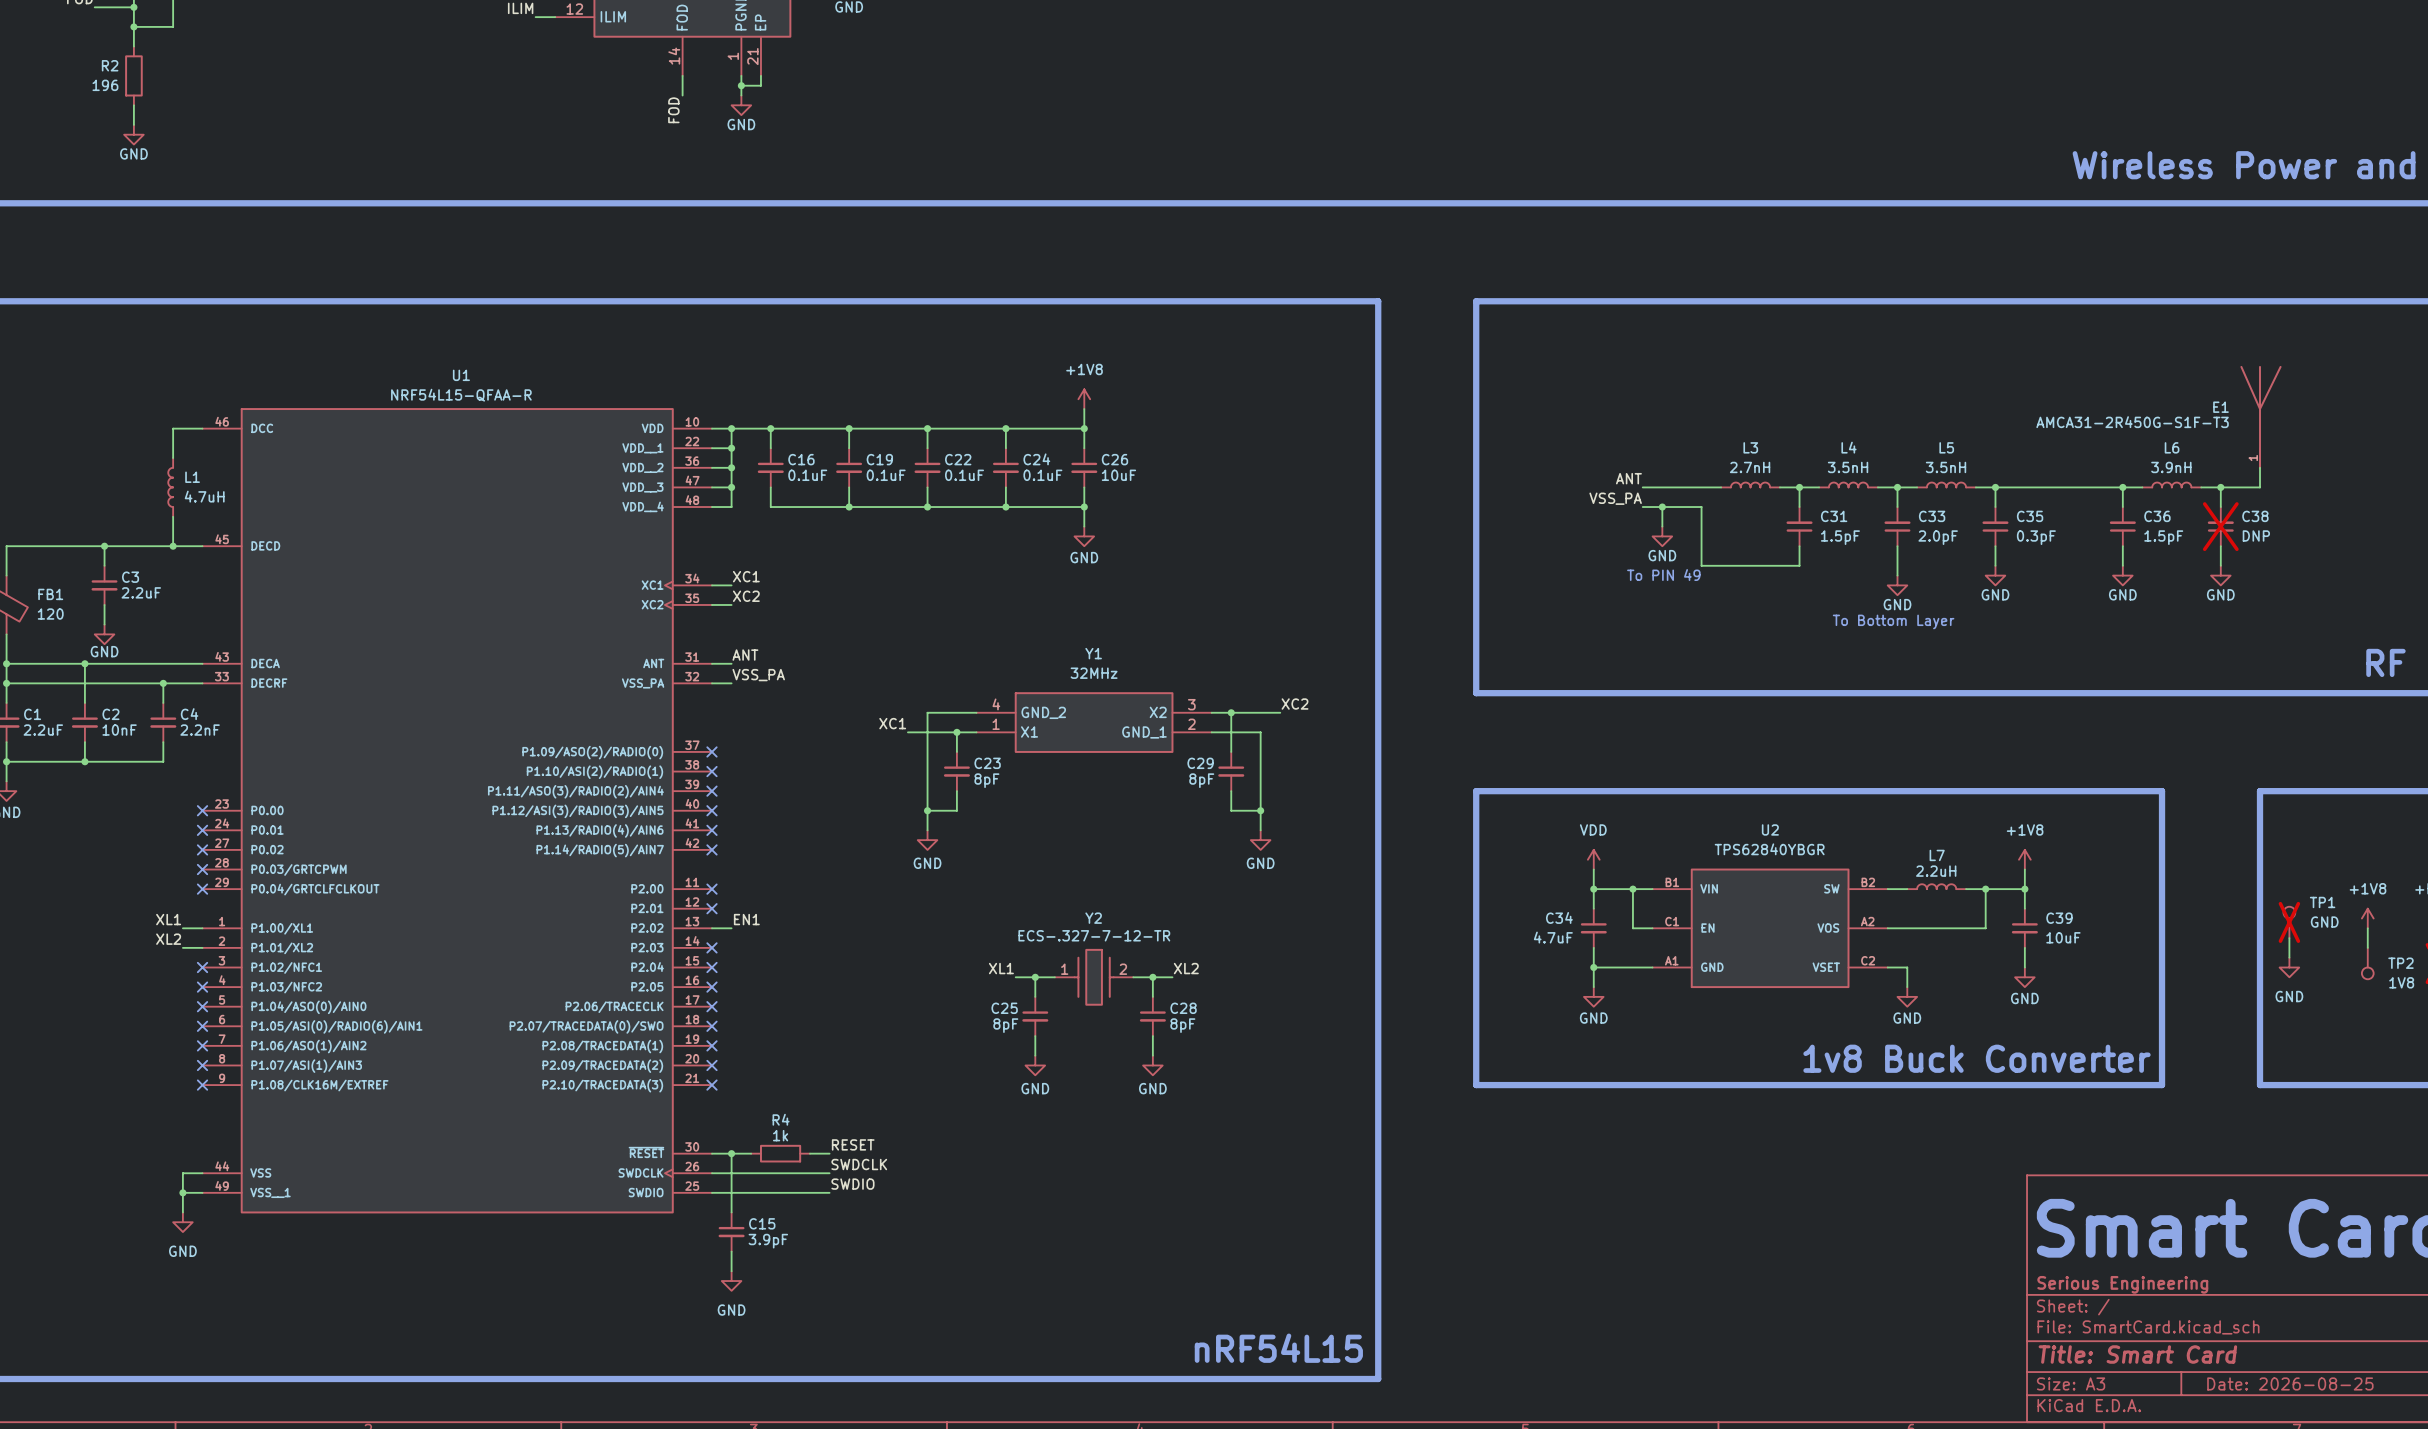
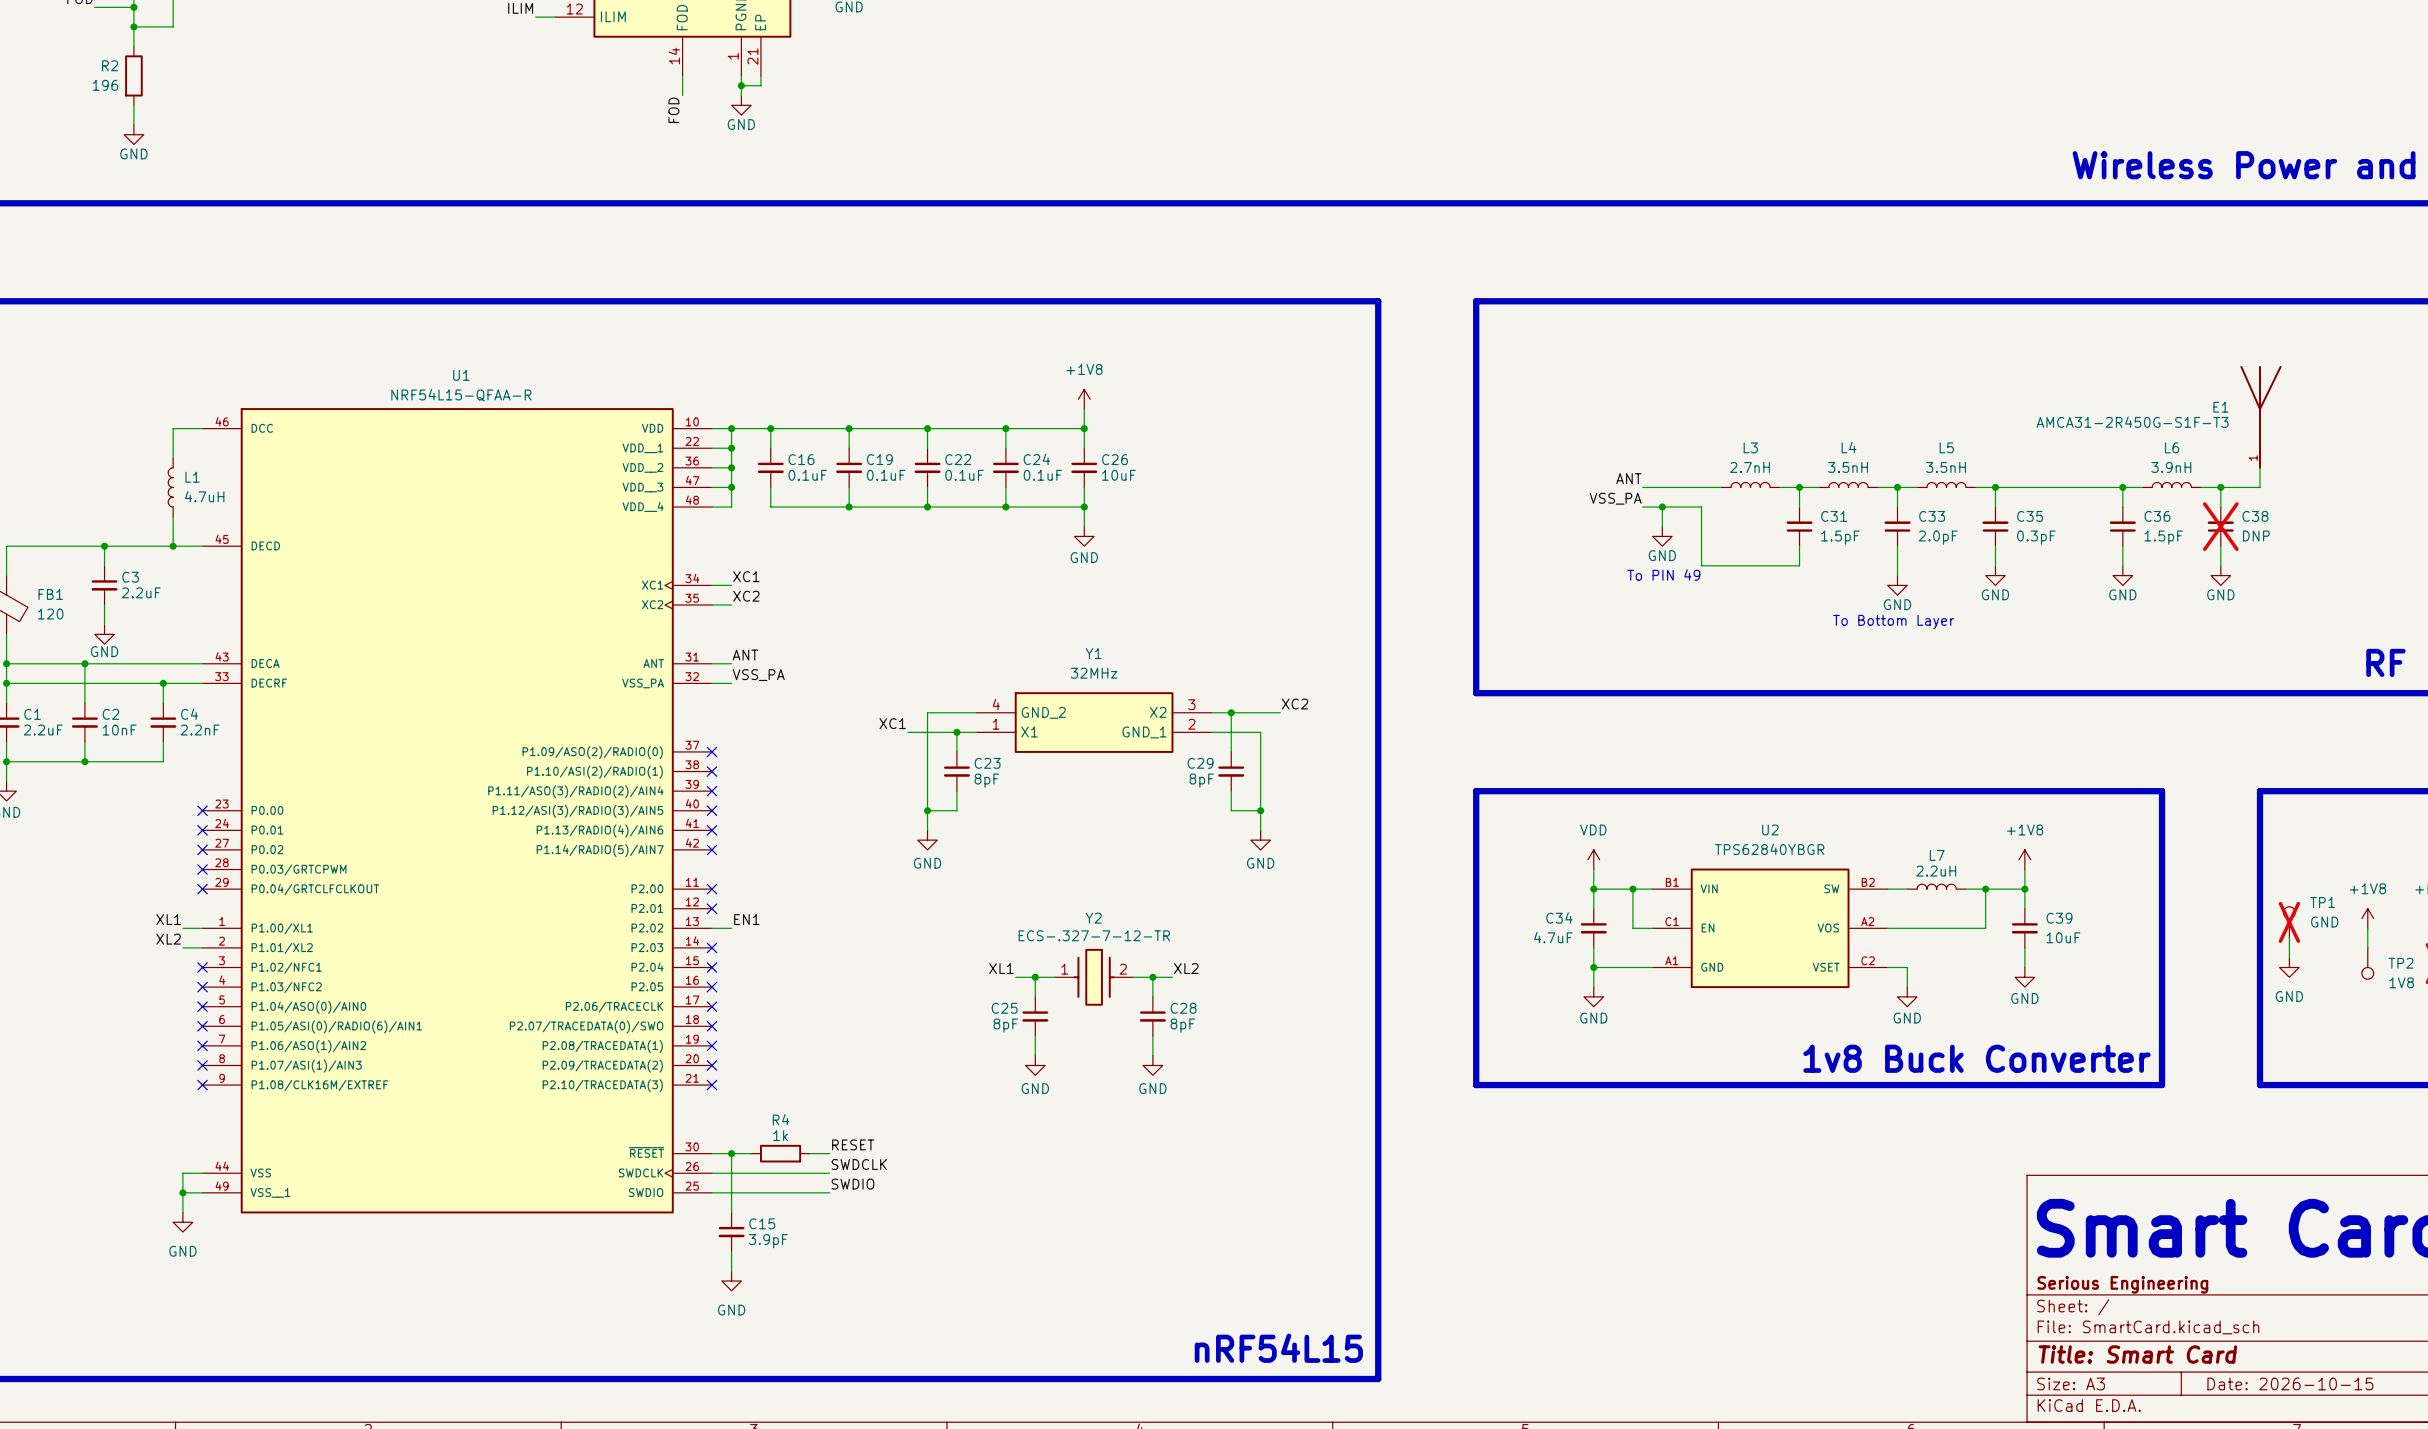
title block: Date: 2026-08-25 (2290, 1383) -> Date: 2026-10-15 (2290, 1383)

